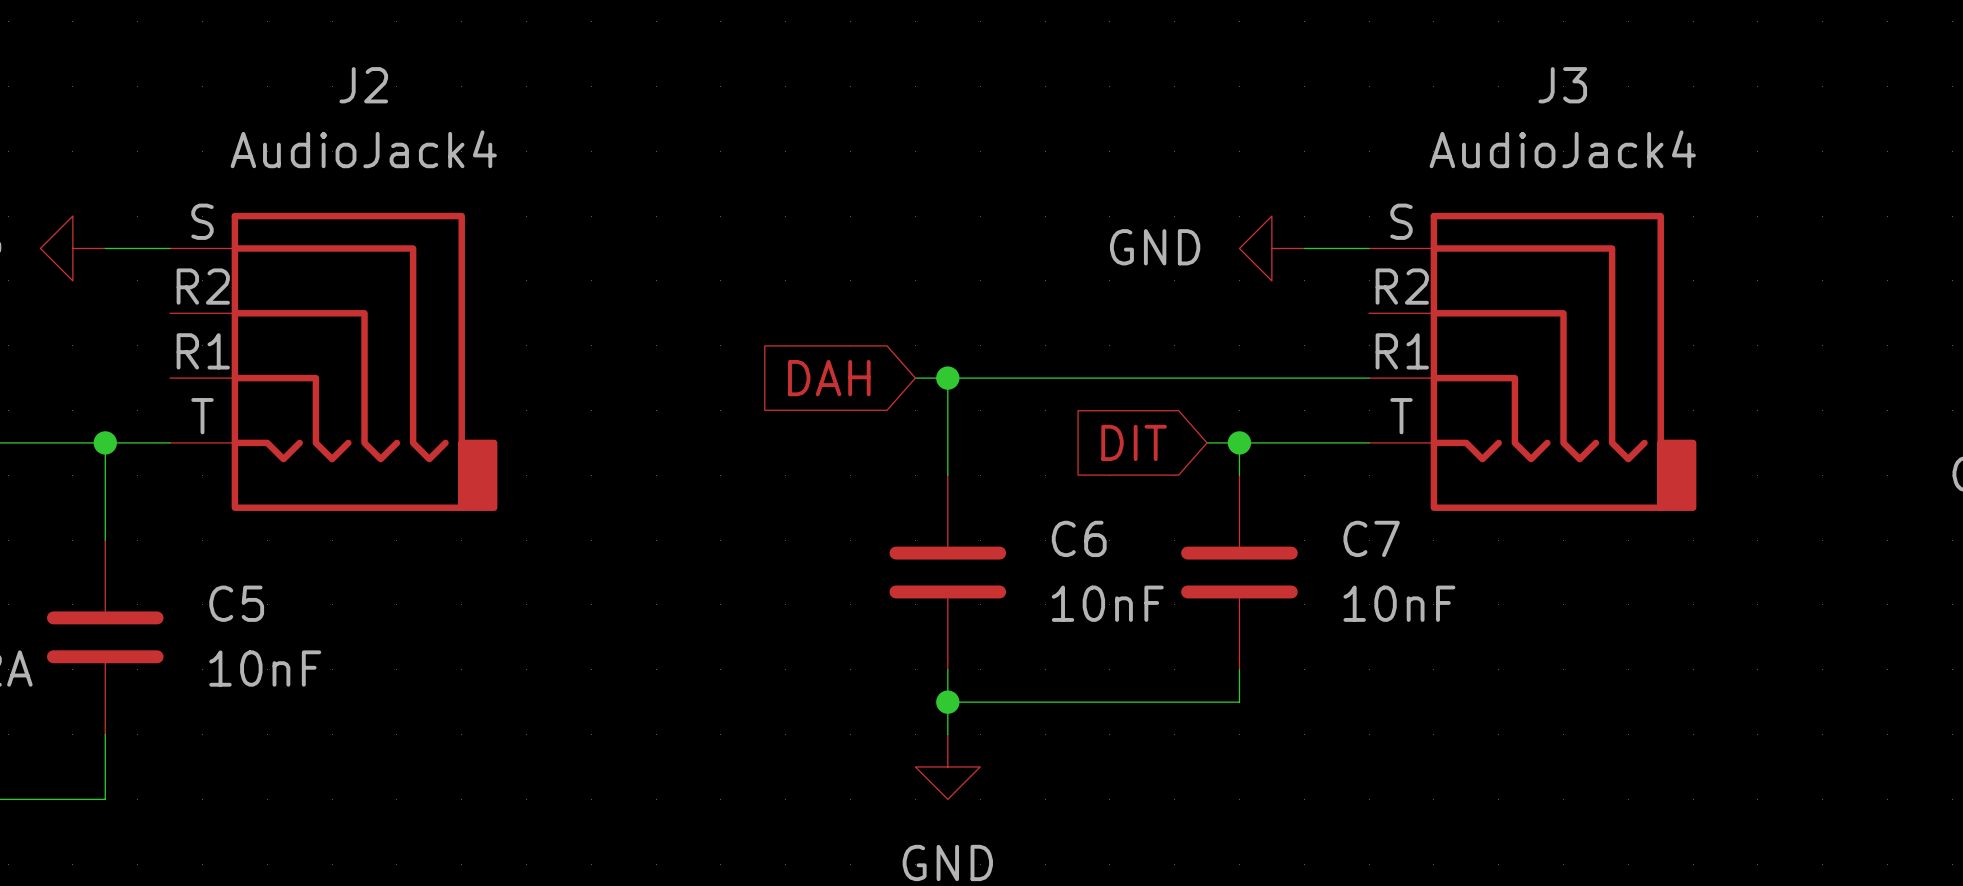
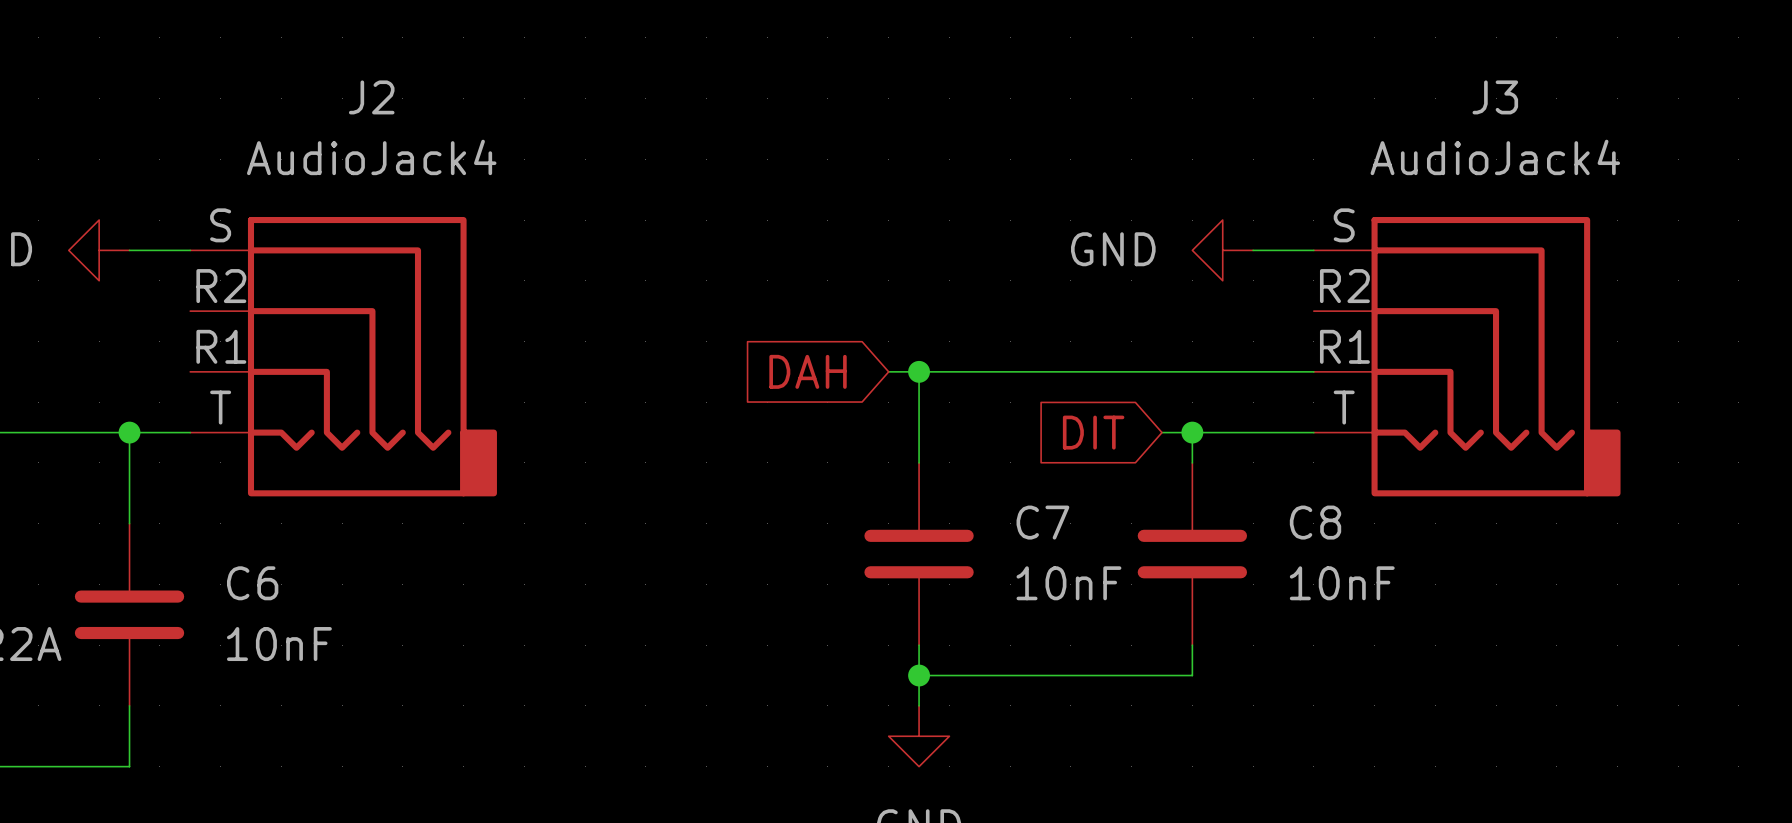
C6 name: C6 (1079, 538) -> C7 (1042, 522)
C7 name: C7 (1371, 538) -> C8 (1315, 522)
C5 name: C5 (236, 603) -> C6 (252, 583)

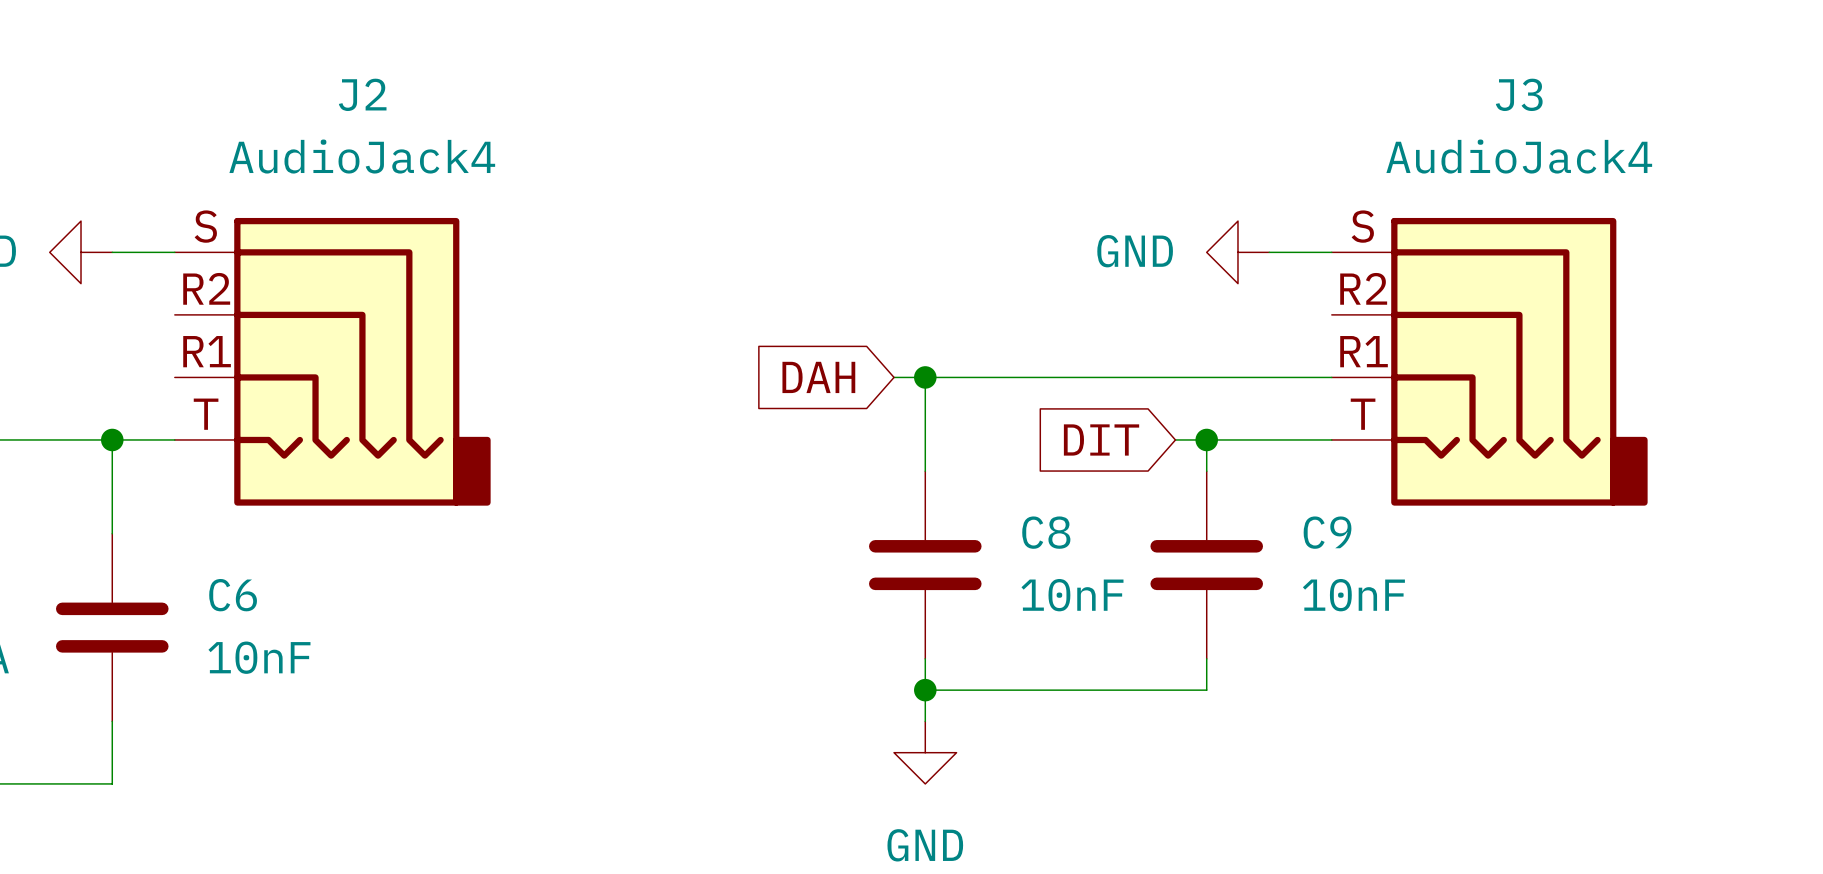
C7 name: C7 (1042, 522) -> C8 (1046, 532)
C8 name: C8 (1315, 522) -> C9 (1327, 532)

